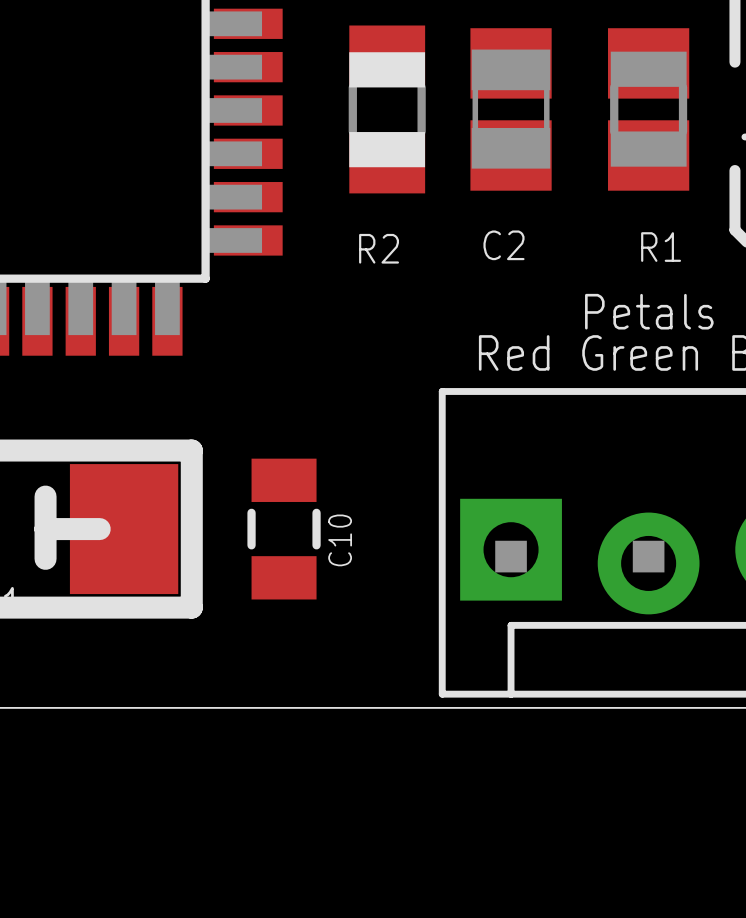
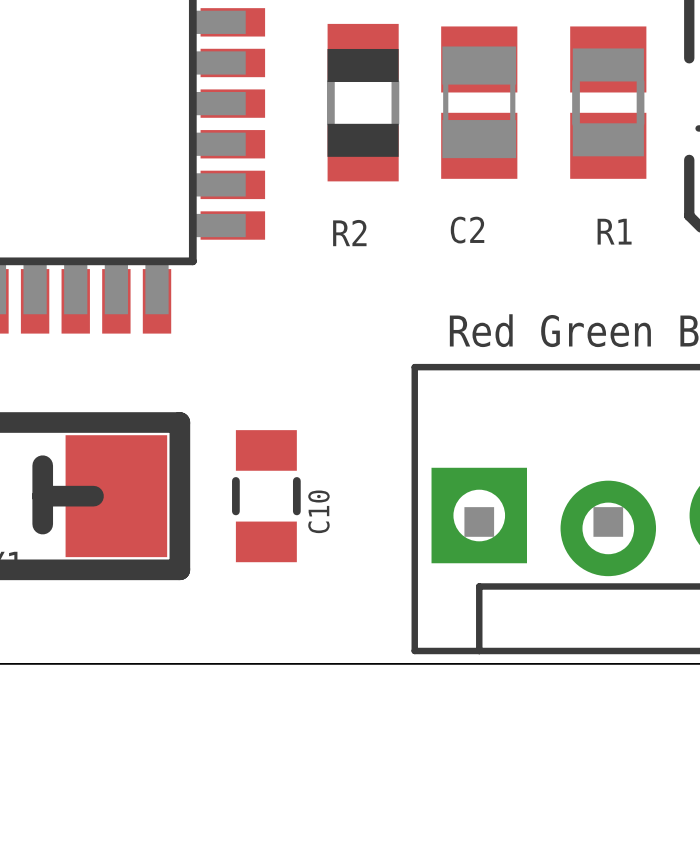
text: Petals (649, 311) -> none

